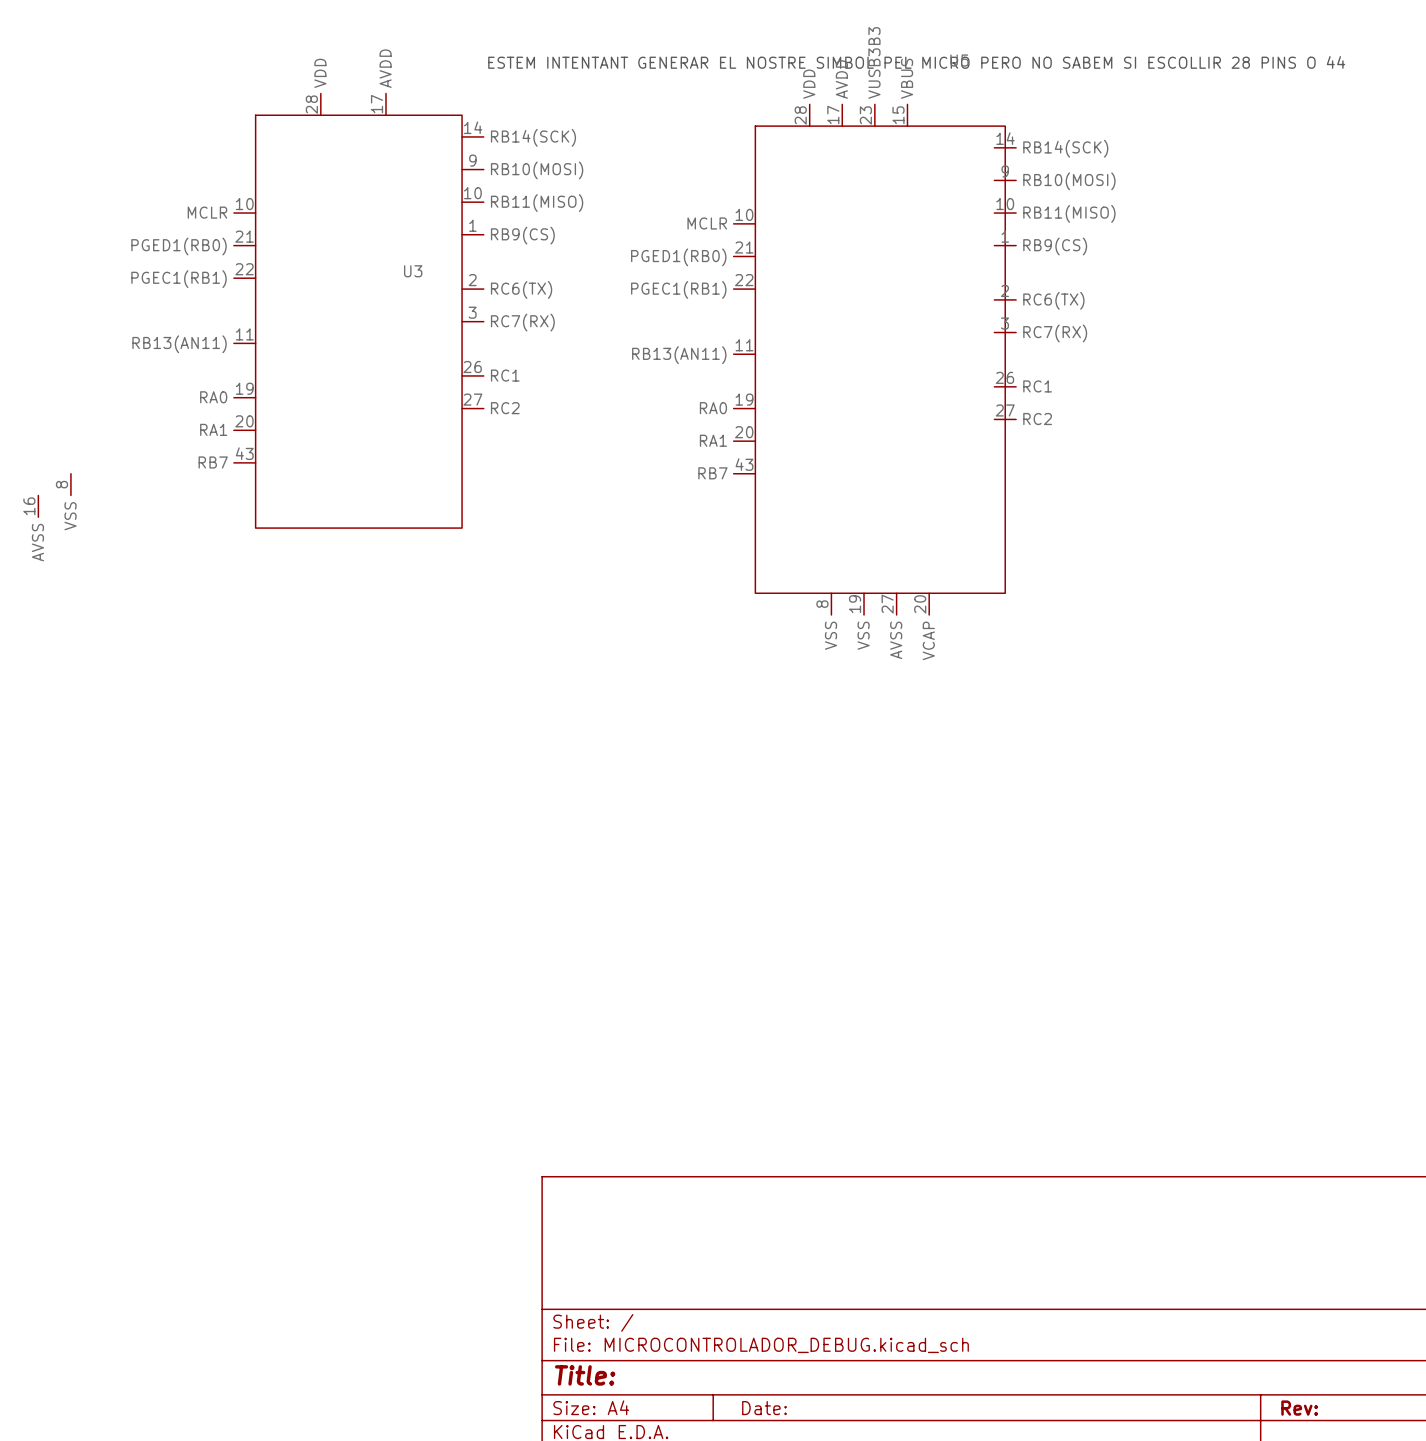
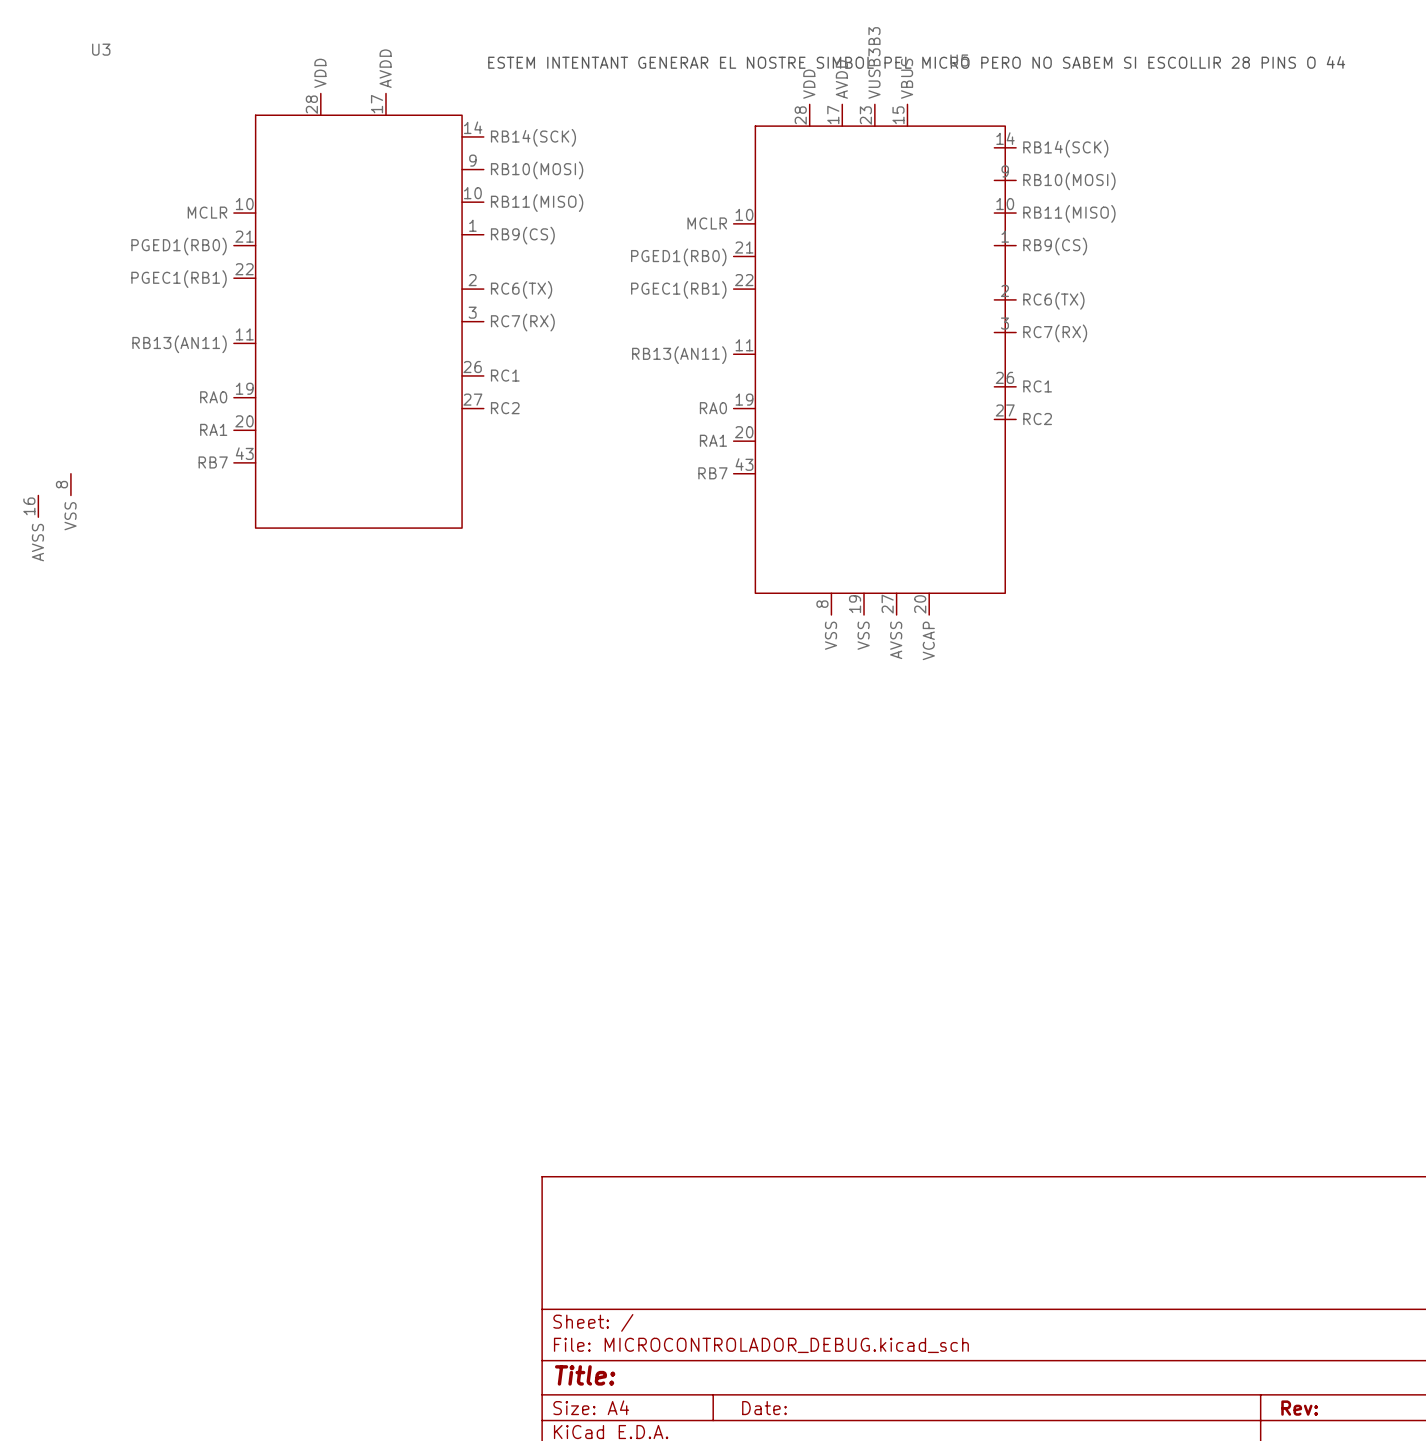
U3 name position: U3 (413, 271) -> U3 (101, 49)

